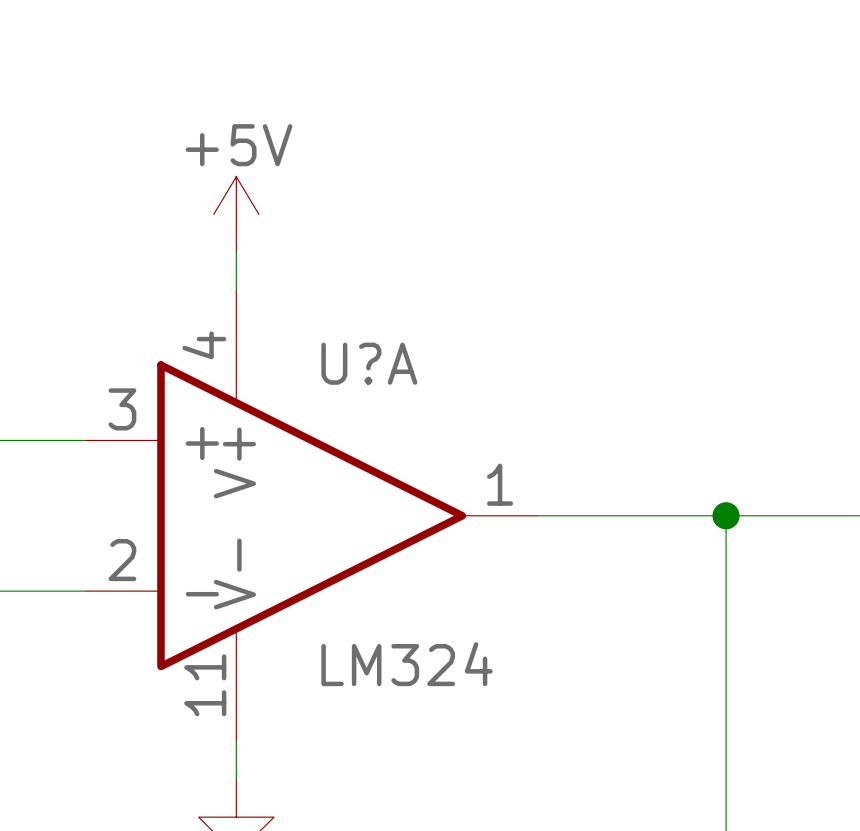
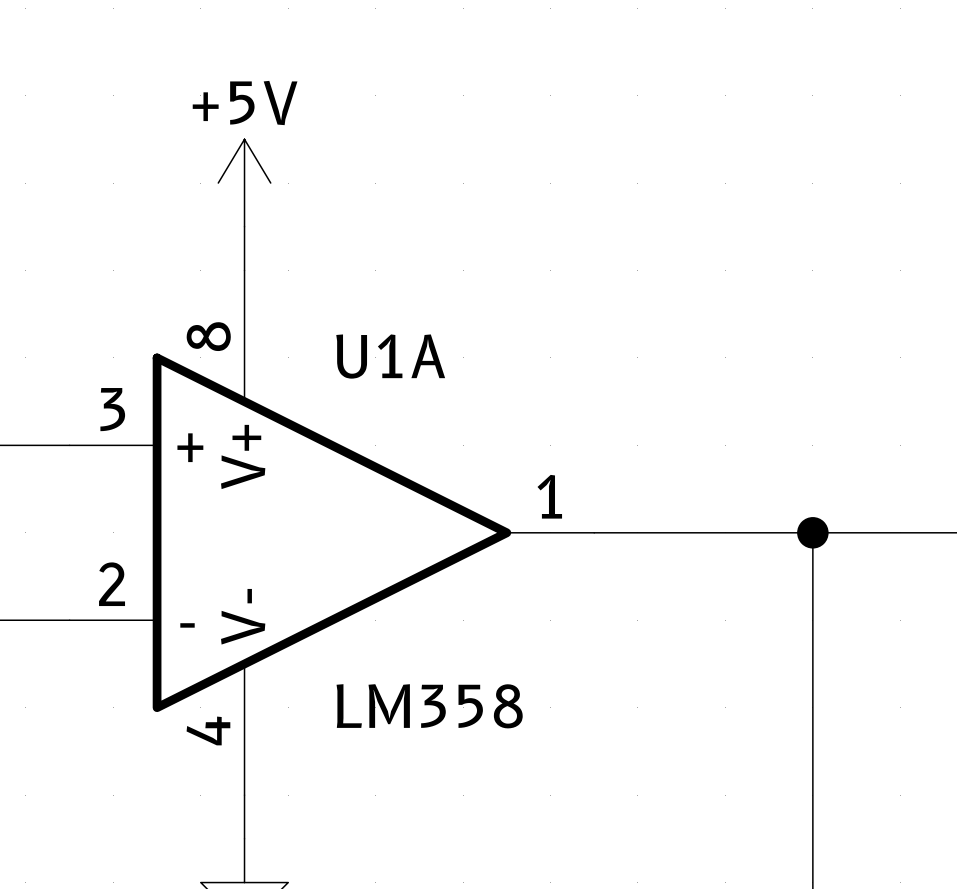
U?A pin number: 4 (204, 345) -> 8 (208, 336)
U?A name: U?A (369, 363) -> U1A (390, 356)
U?A value: LM324 (407, 664) -> LM358 (429, 706)
U?A pin number: 11 (205, 685) -> 4 (208, 730)

